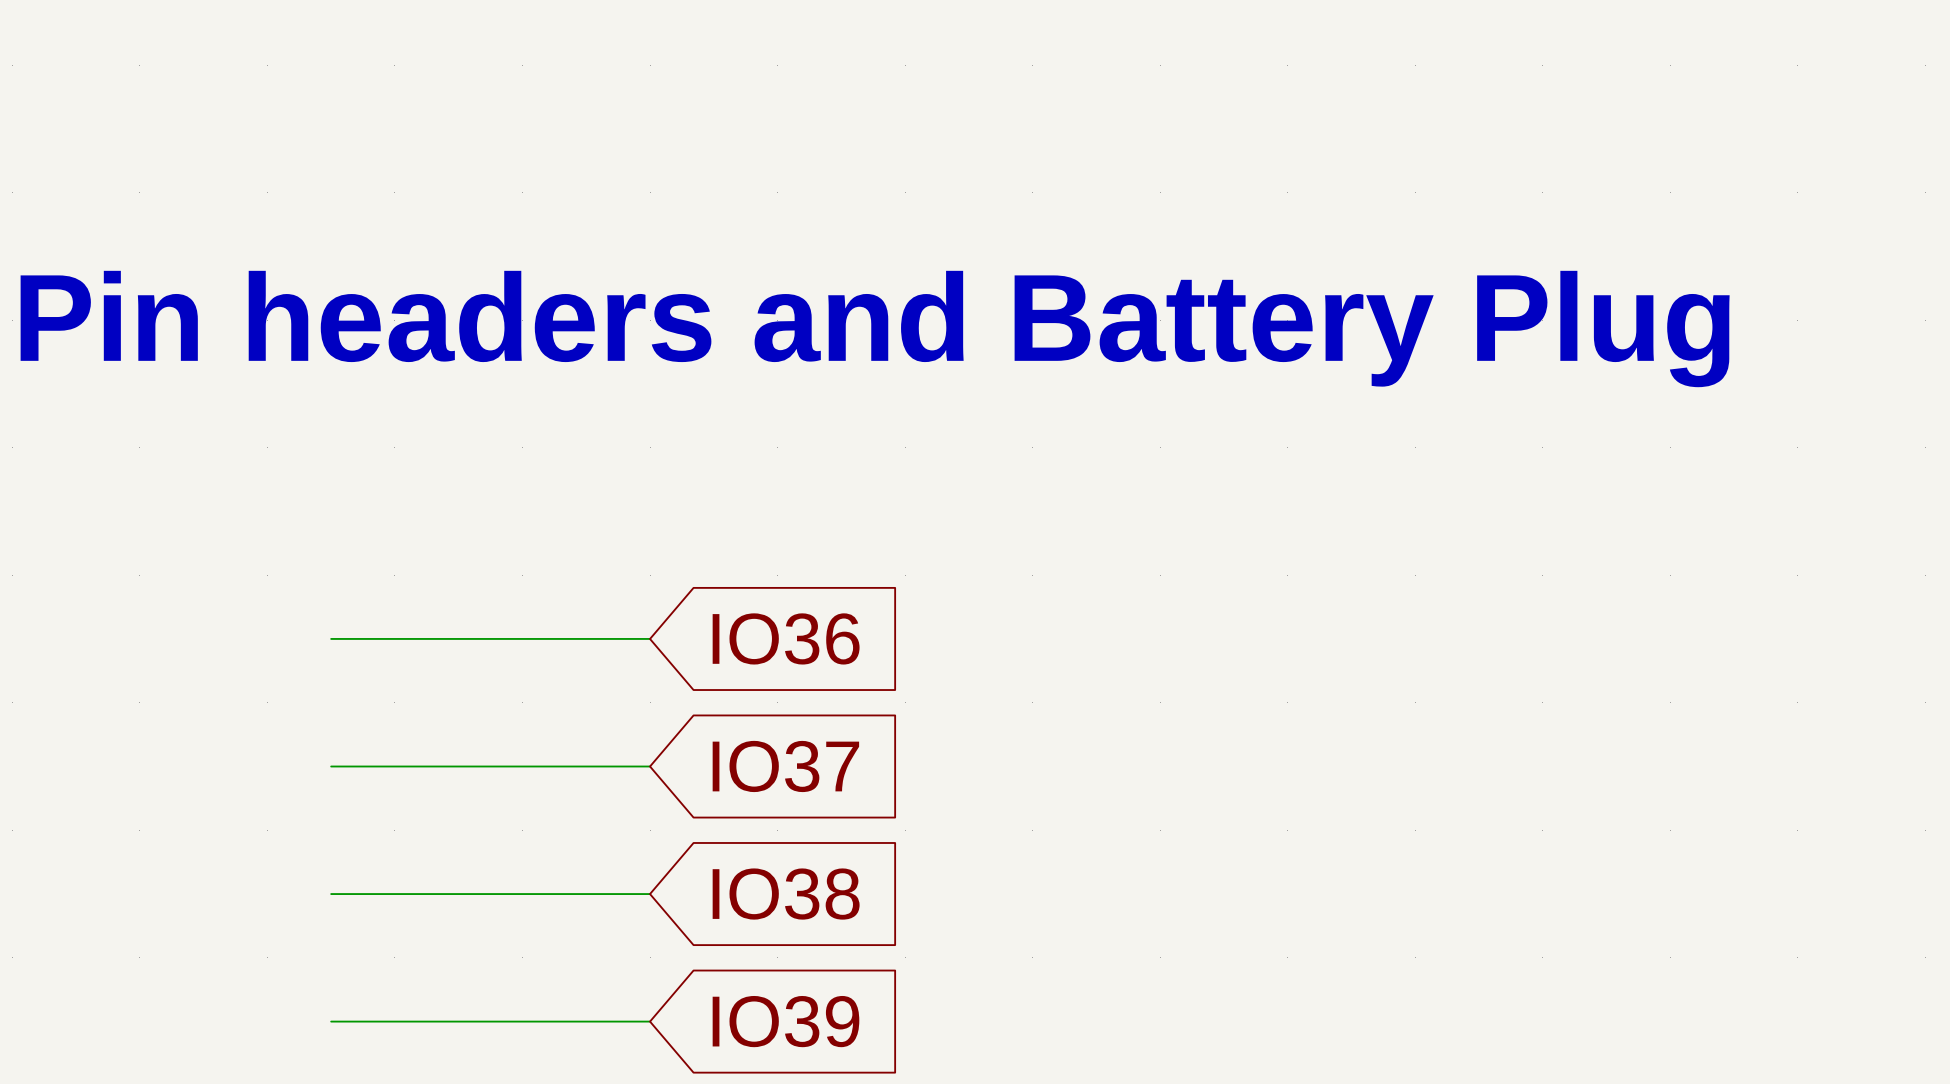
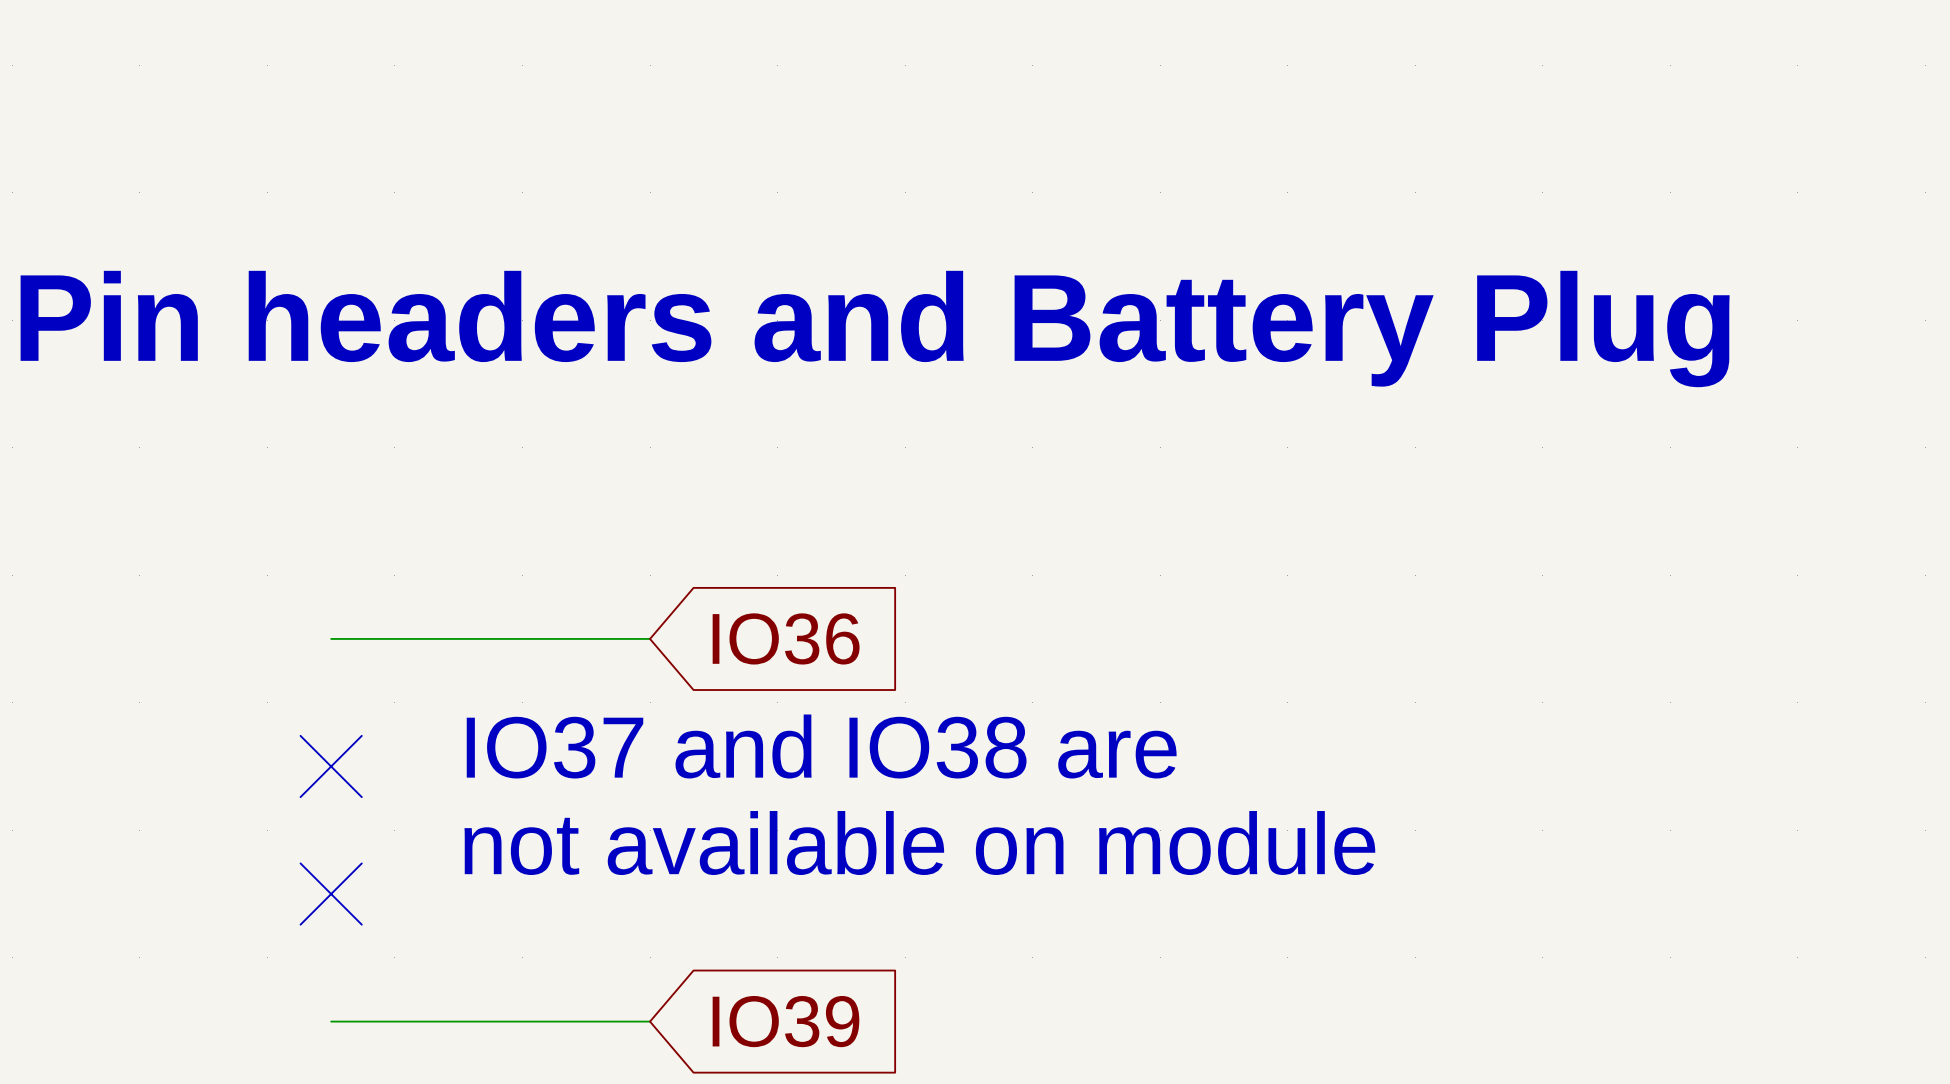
text: none -> IO37 and IO38 are (821, 746)
wire: (331, 766) (650, 766) -> none
no-connect mark: none -> (331, 766)
global label: IO37 (785, 766) -> none
text: none -> not available on module (919, 843)
wire: (331, 894) (650, 894) -> none
no-connect mark: none -> (331, 894)
global label: IO38 (786, 894) -> none

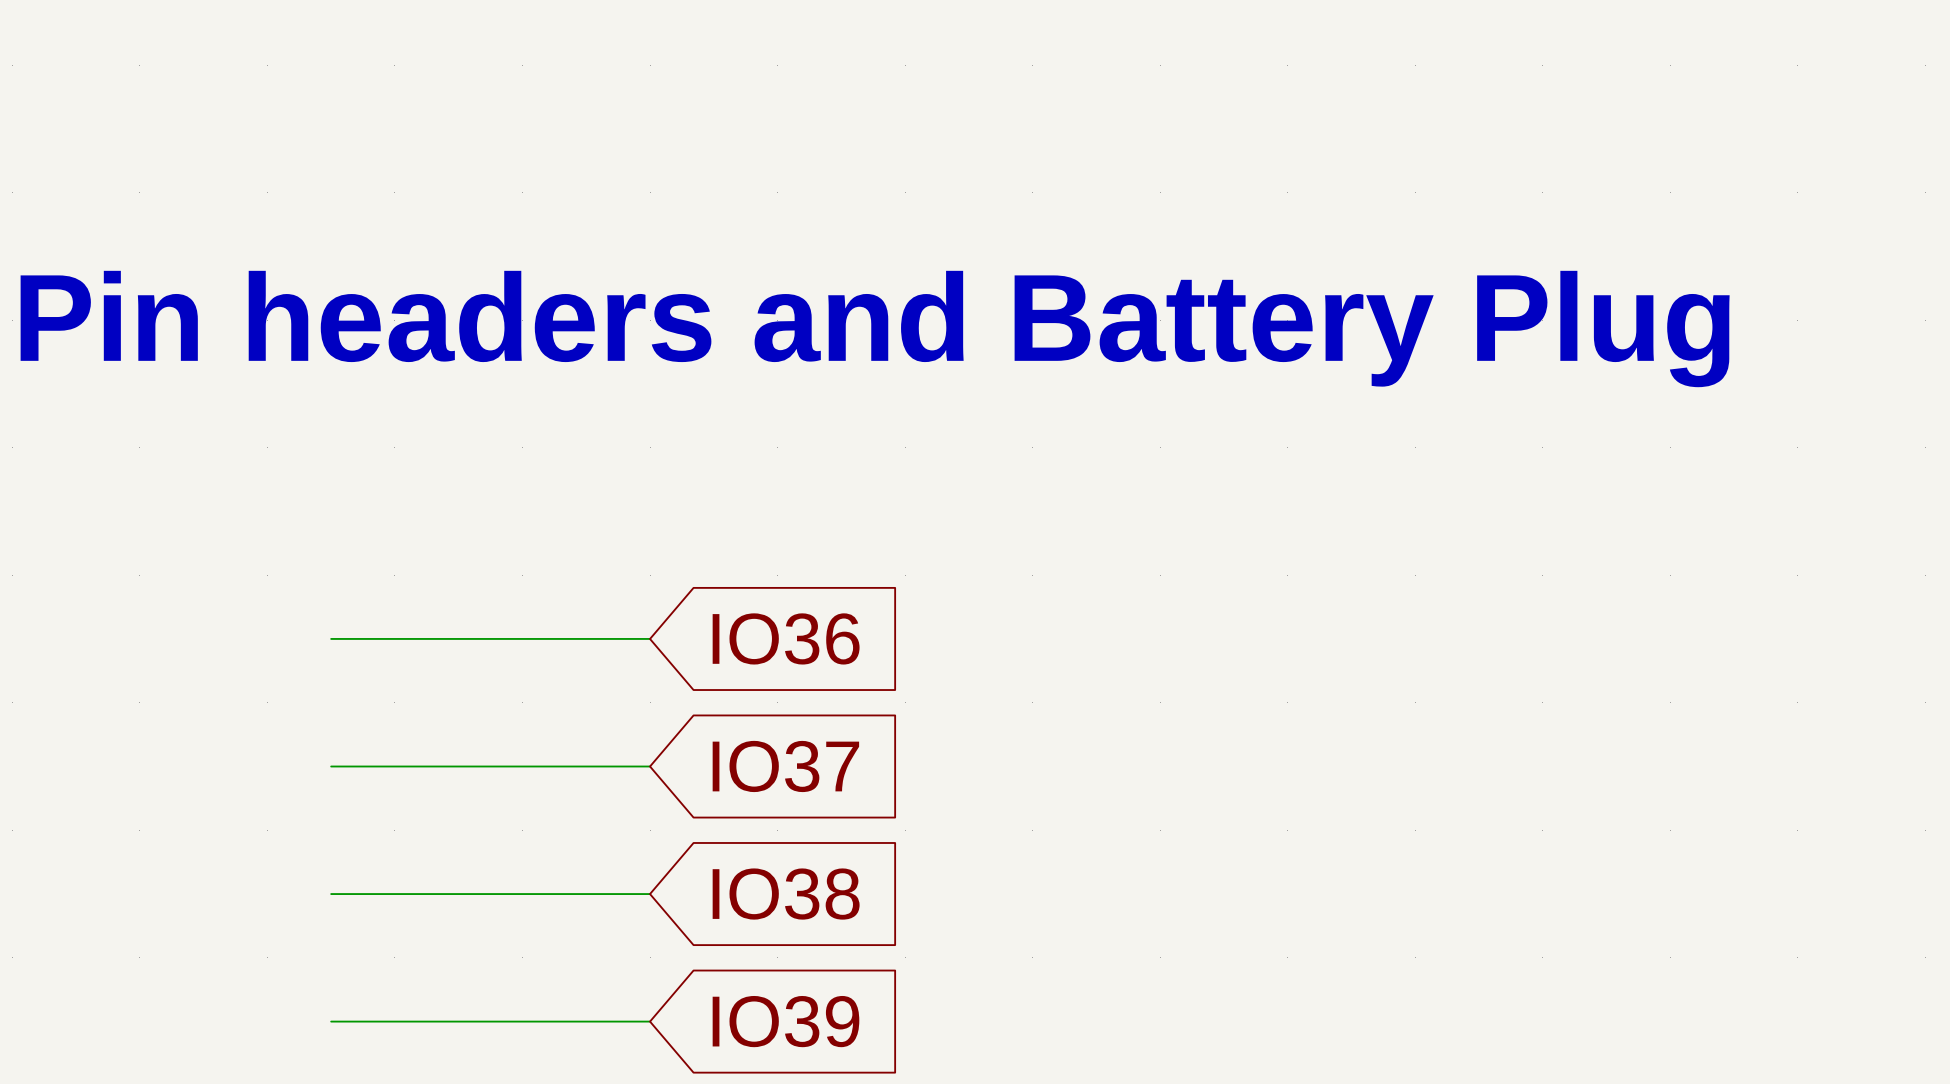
text: IO37 and IO38 are (821, 746) -> none
wire: none -> (331, 766) (650, 766)
no-connect mark: (331, 766) -> none
global label: none -> IO37 (785, 766)
text: not available on module (919, 843) -> none
wire: none -> (331, 894) (650, 894)
no-connect mark: (331, 894) -> none
global label: none -> IO38 (786, 894)

